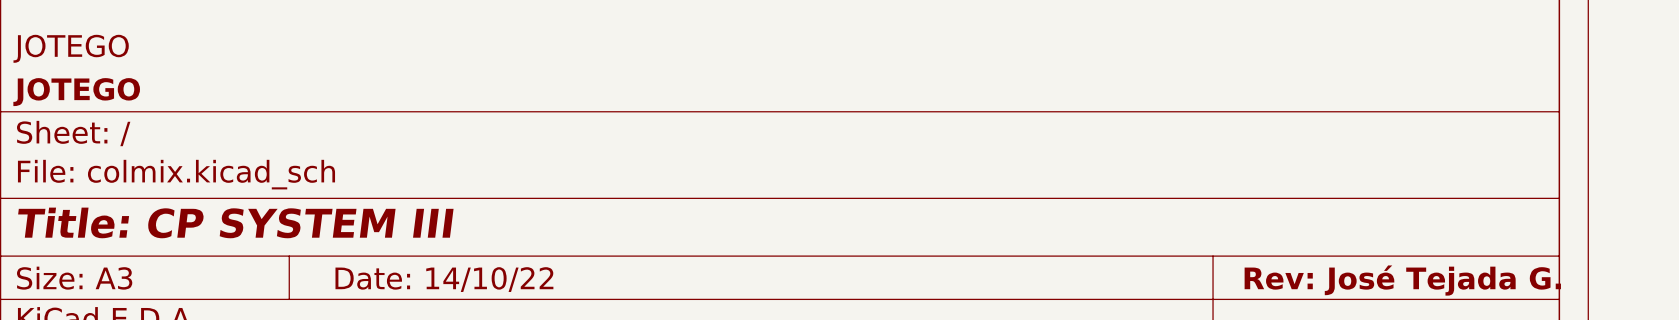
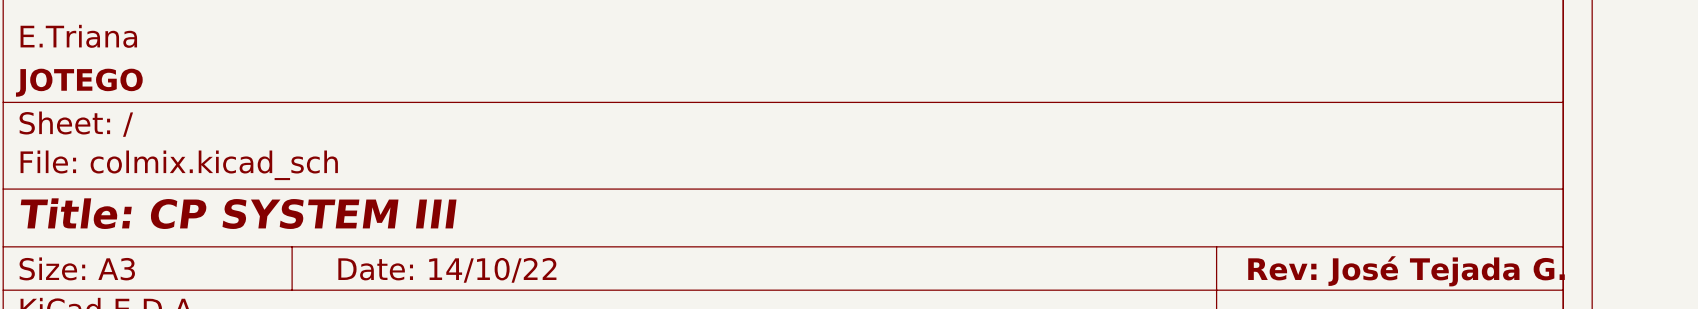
title block: JOTEGO (71, 48) -> E.Triana (78, 36)

